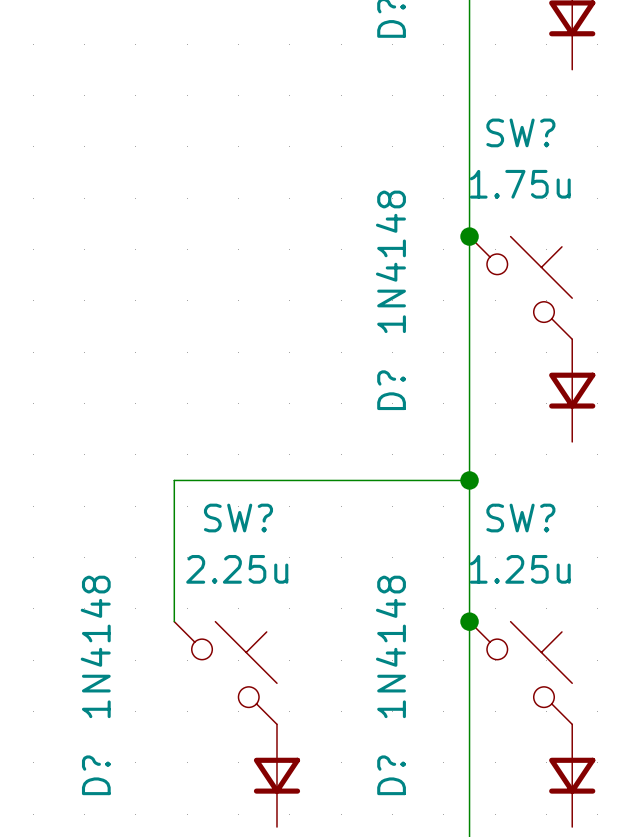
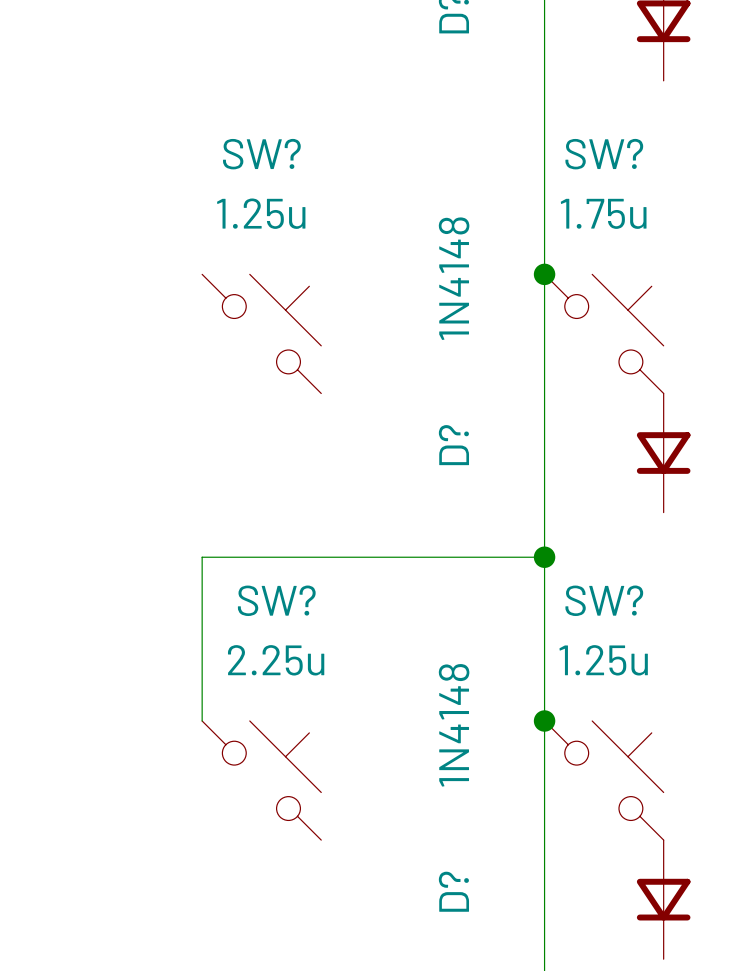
SW?: none -> 1.25u (261, 333)
D?: 1N4148 (276, 775) -> none

